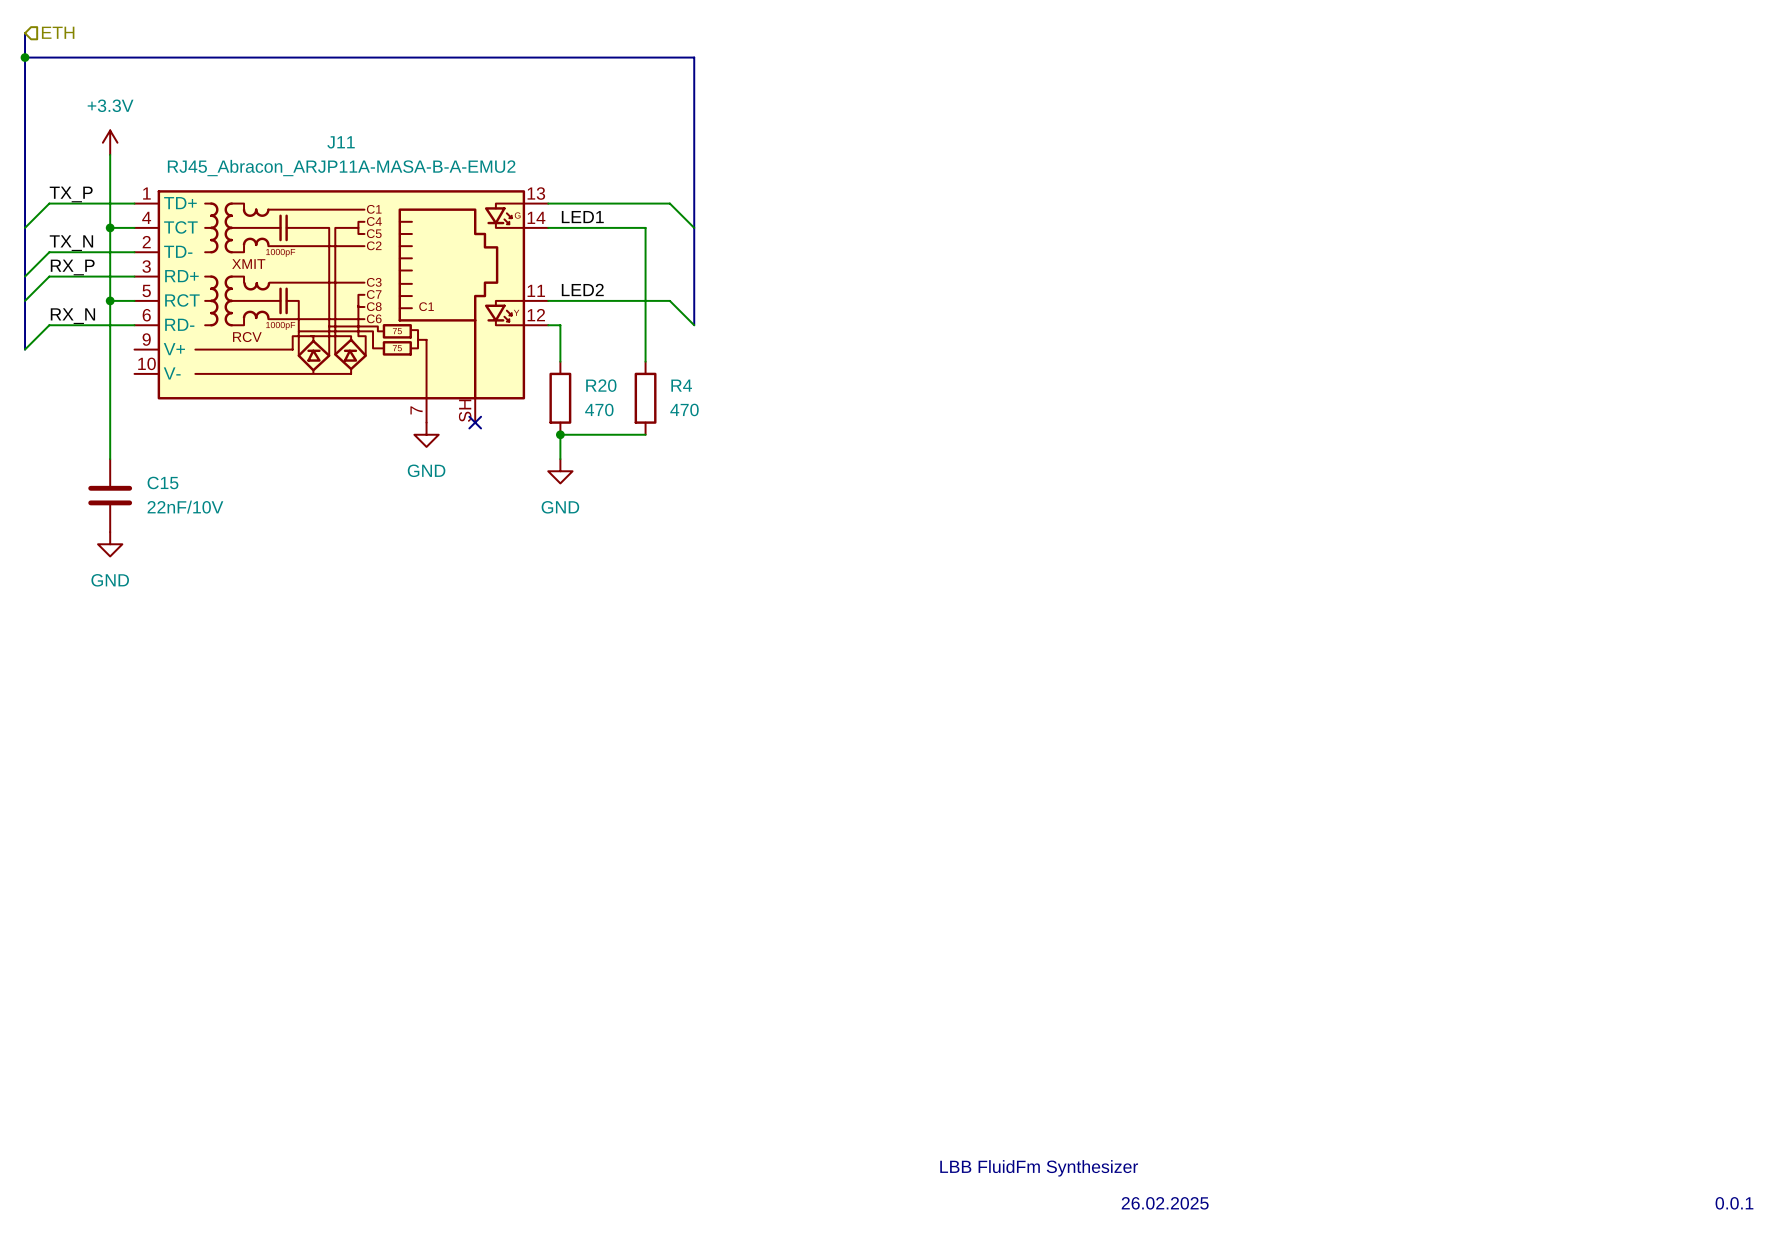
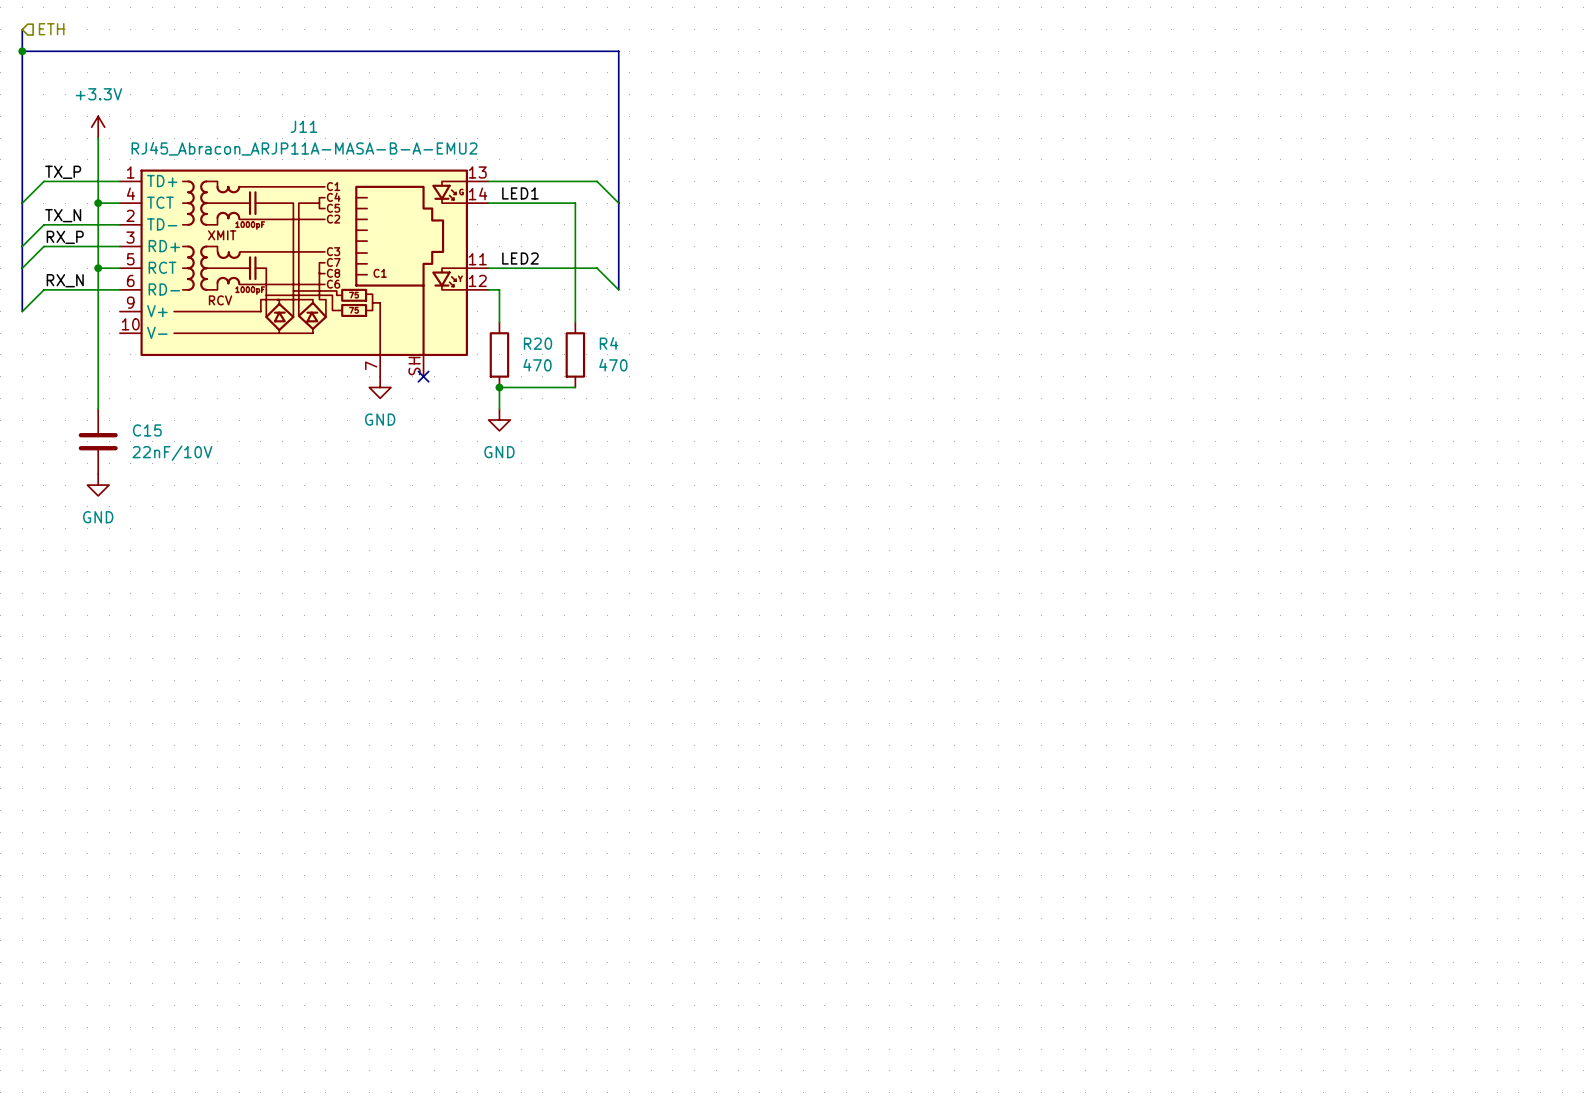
text: LBB FluidFm Synthesizer (1039, 1168) -> none
text: 26.02.2025 (1165, 1203) -> none
text: 0.0.1 (1734, 1203) -> none

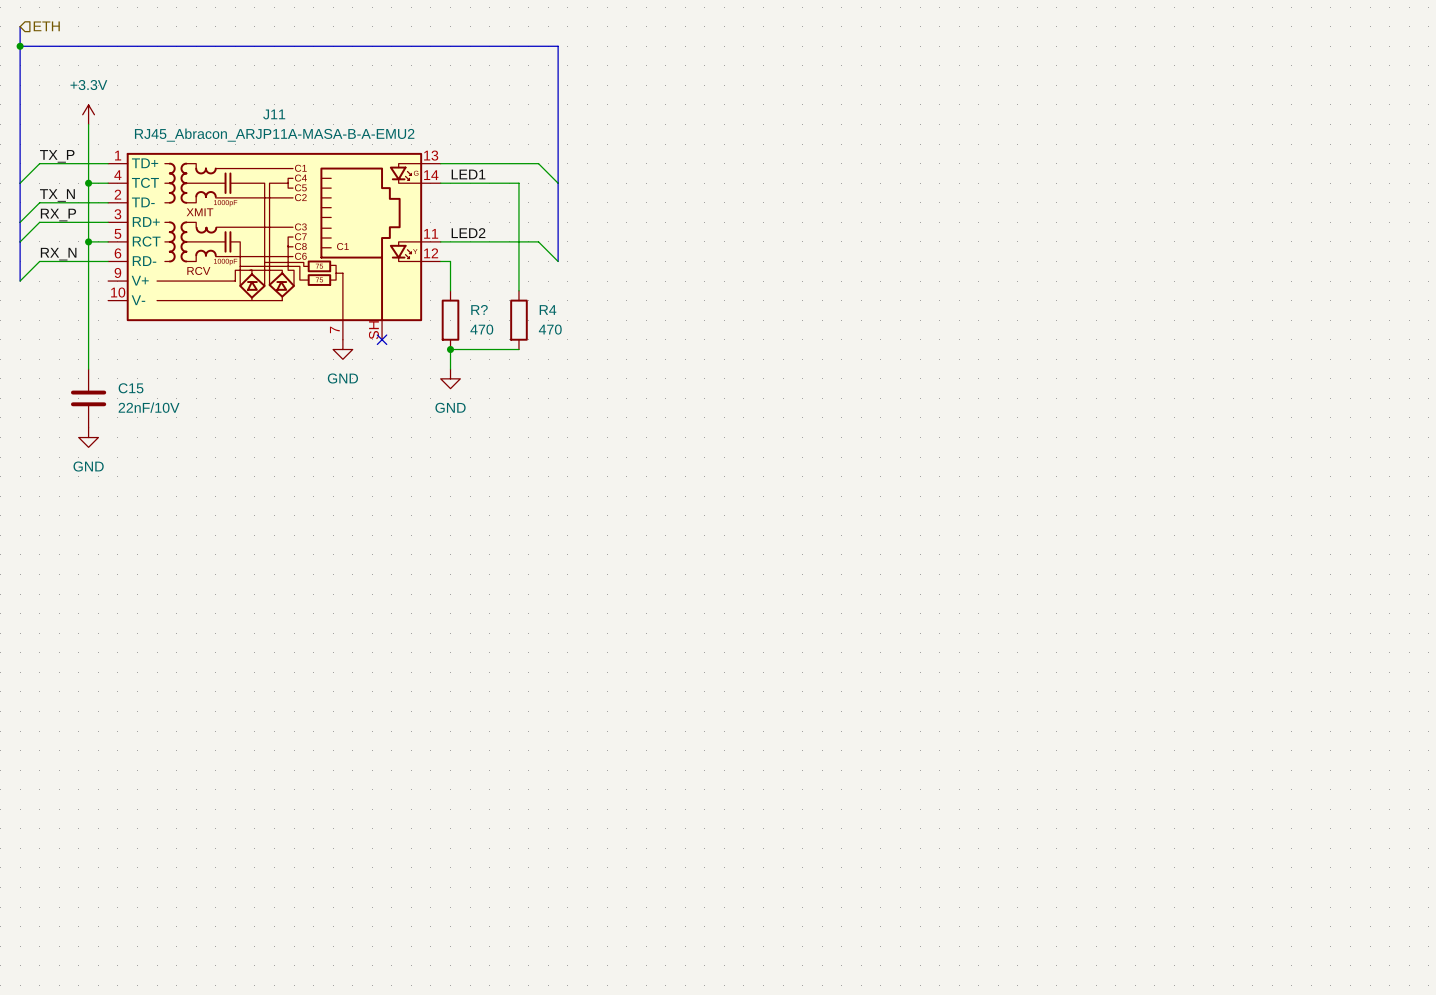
R20 name: R20 (538, 343) -> R? (479, 309)

